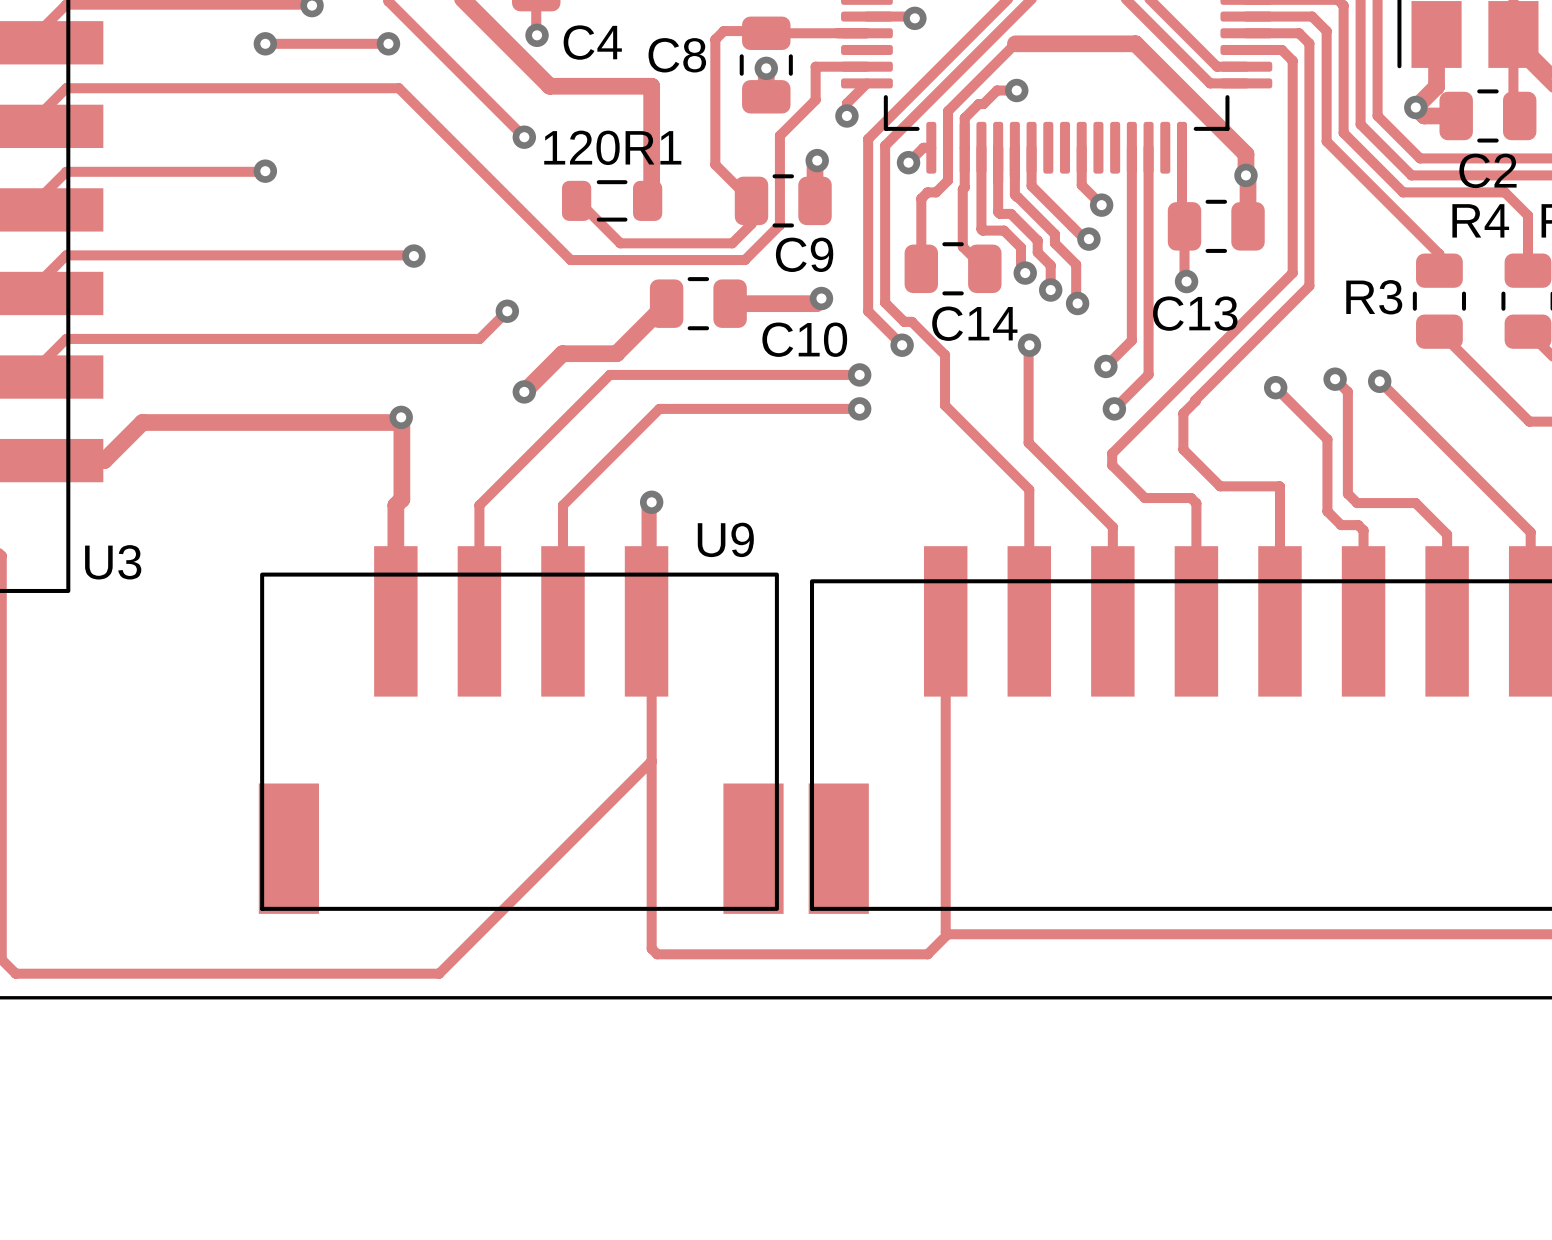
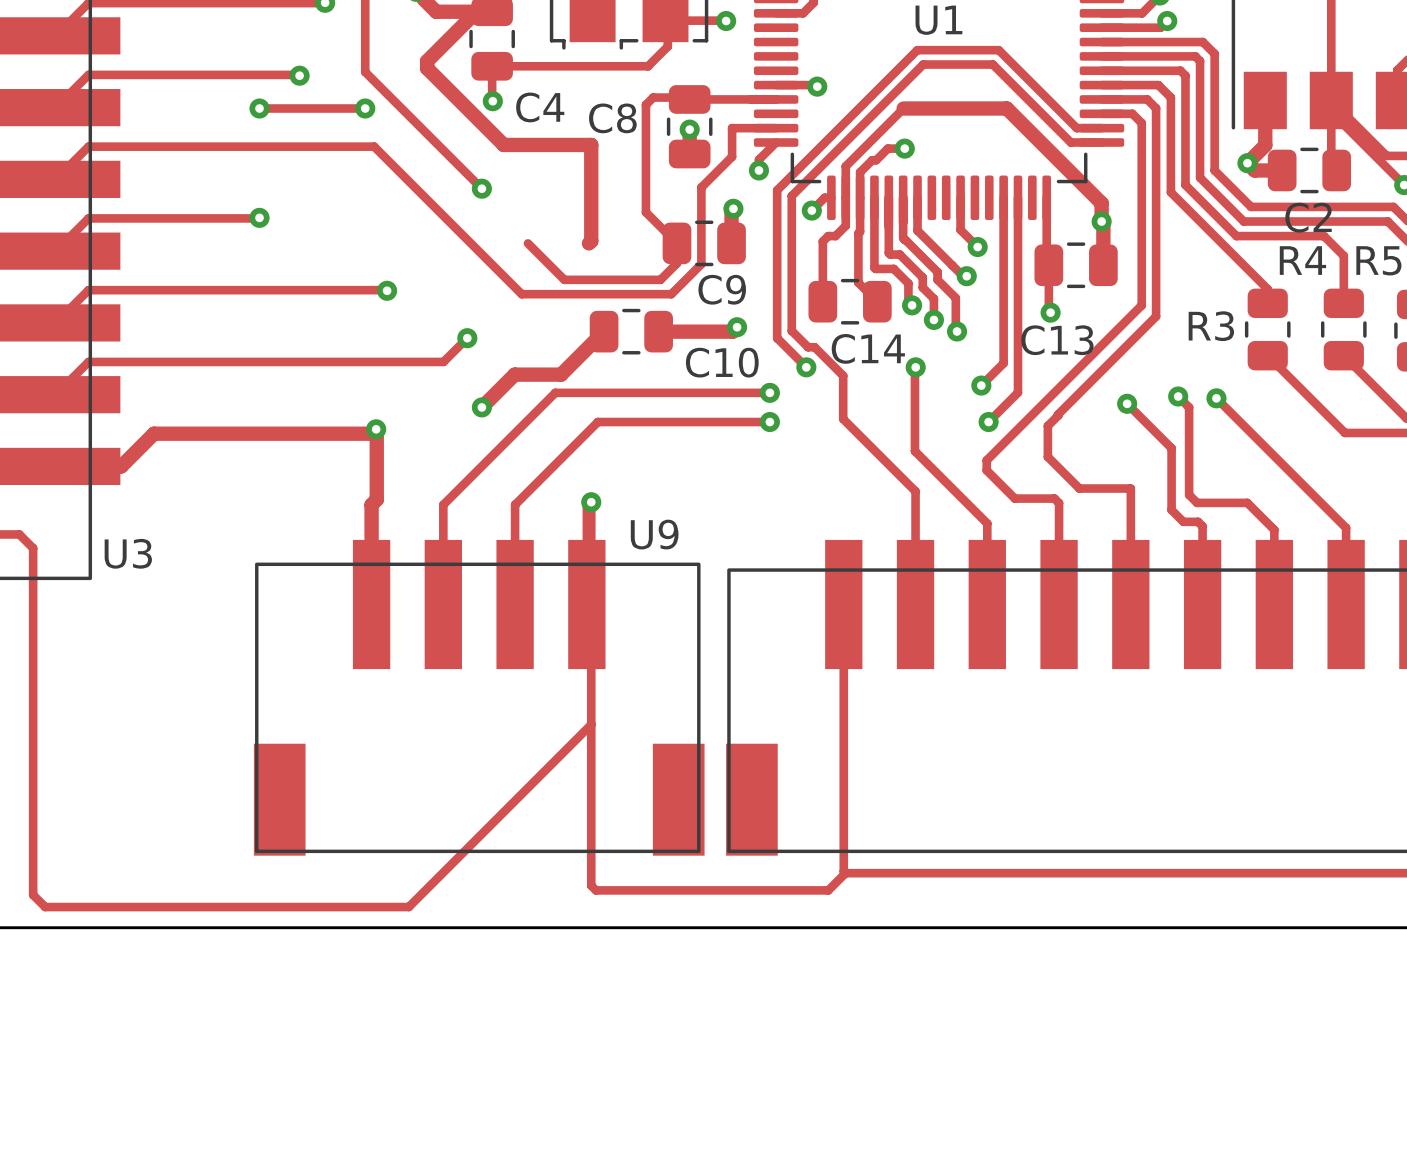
120R1: (612, 200) -> none

